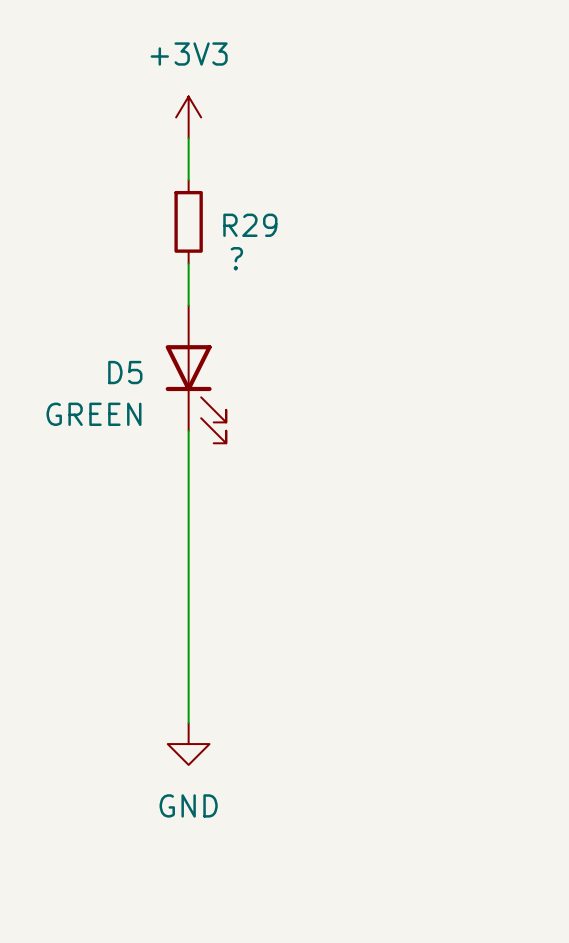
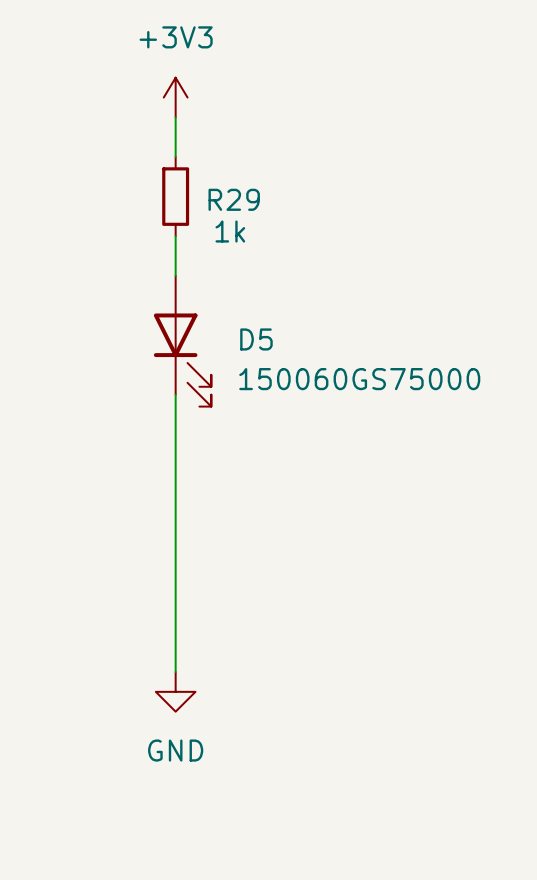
R29 value: ? (236, 258) -> 1k (230, 231)
D5 name position: D5 (125, 372) -> D5 (256, 339)
D5 value: GREEN (93, 414) -> 150060GS75000 (359, 379)

